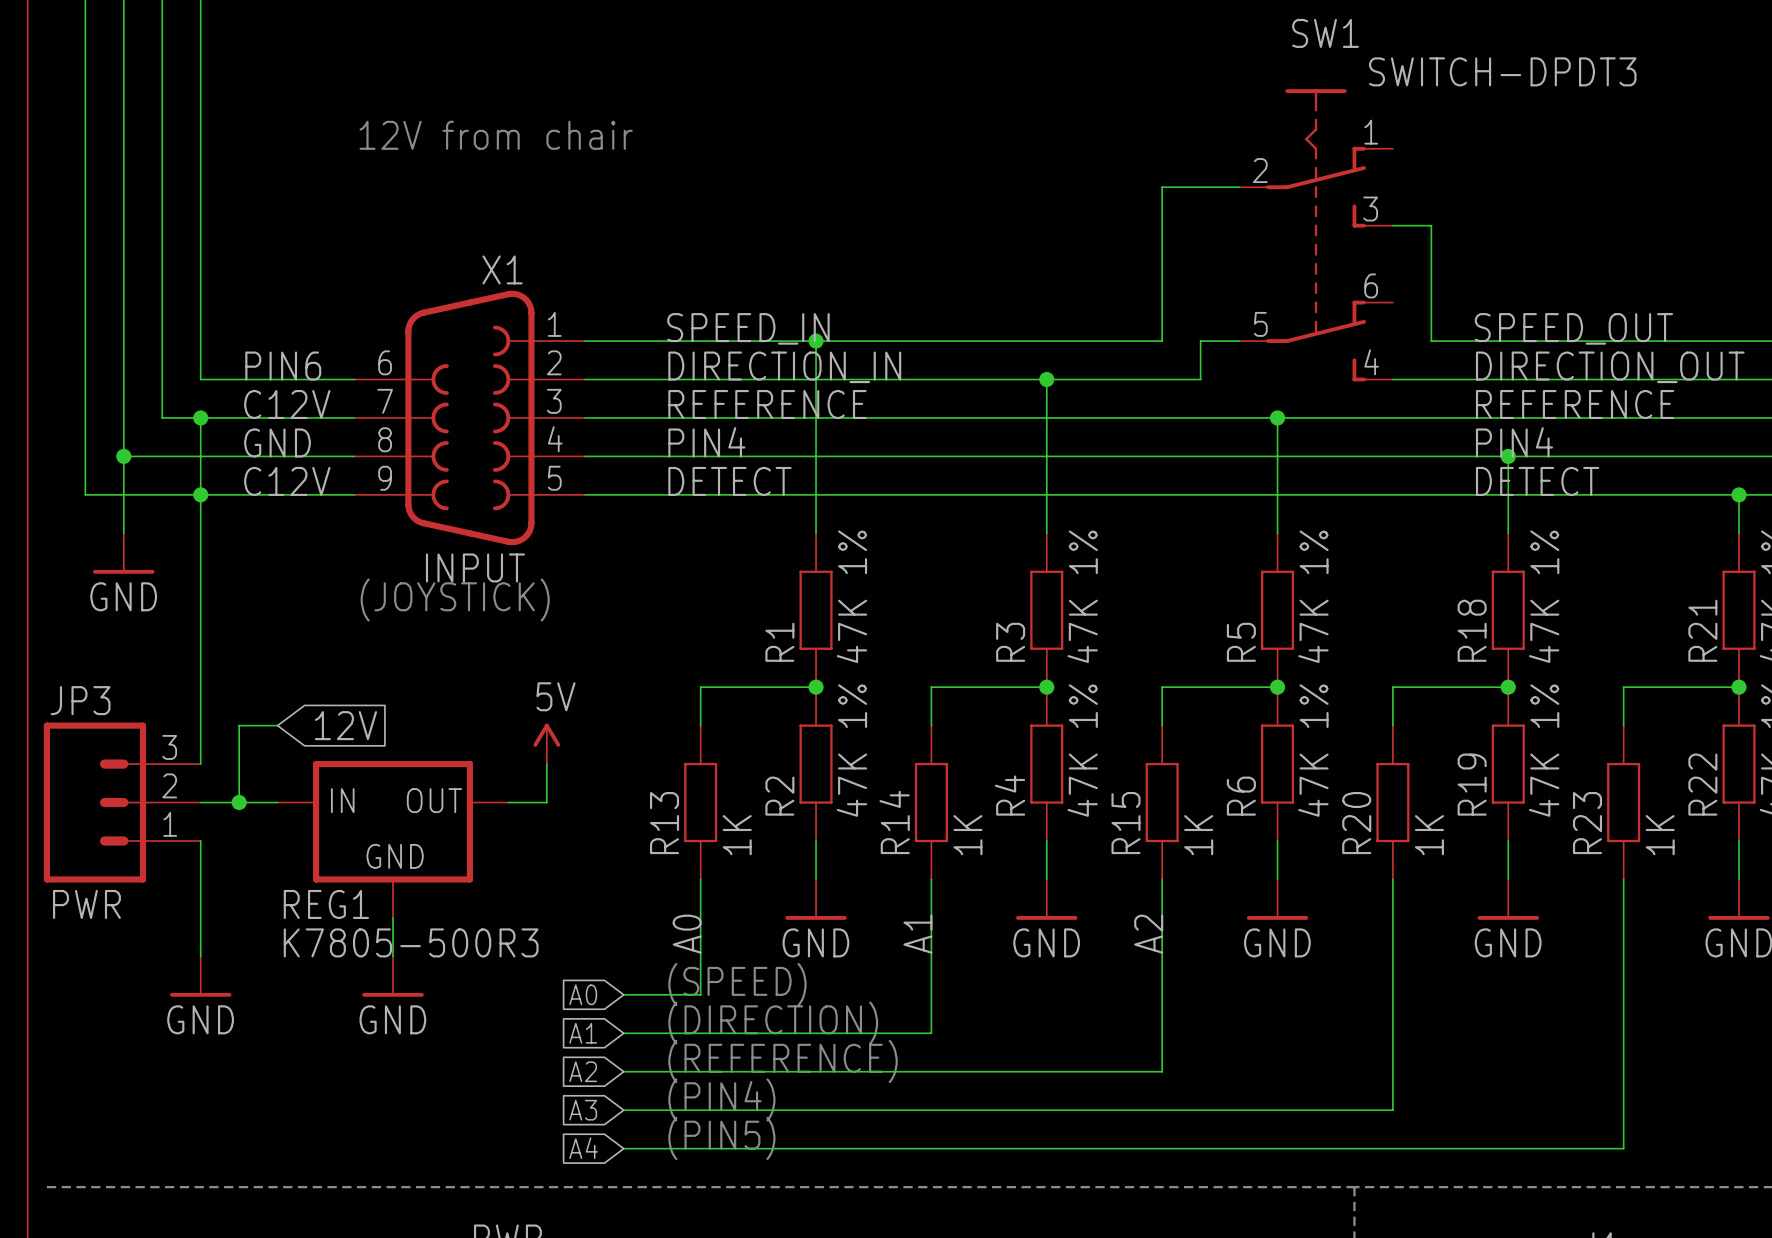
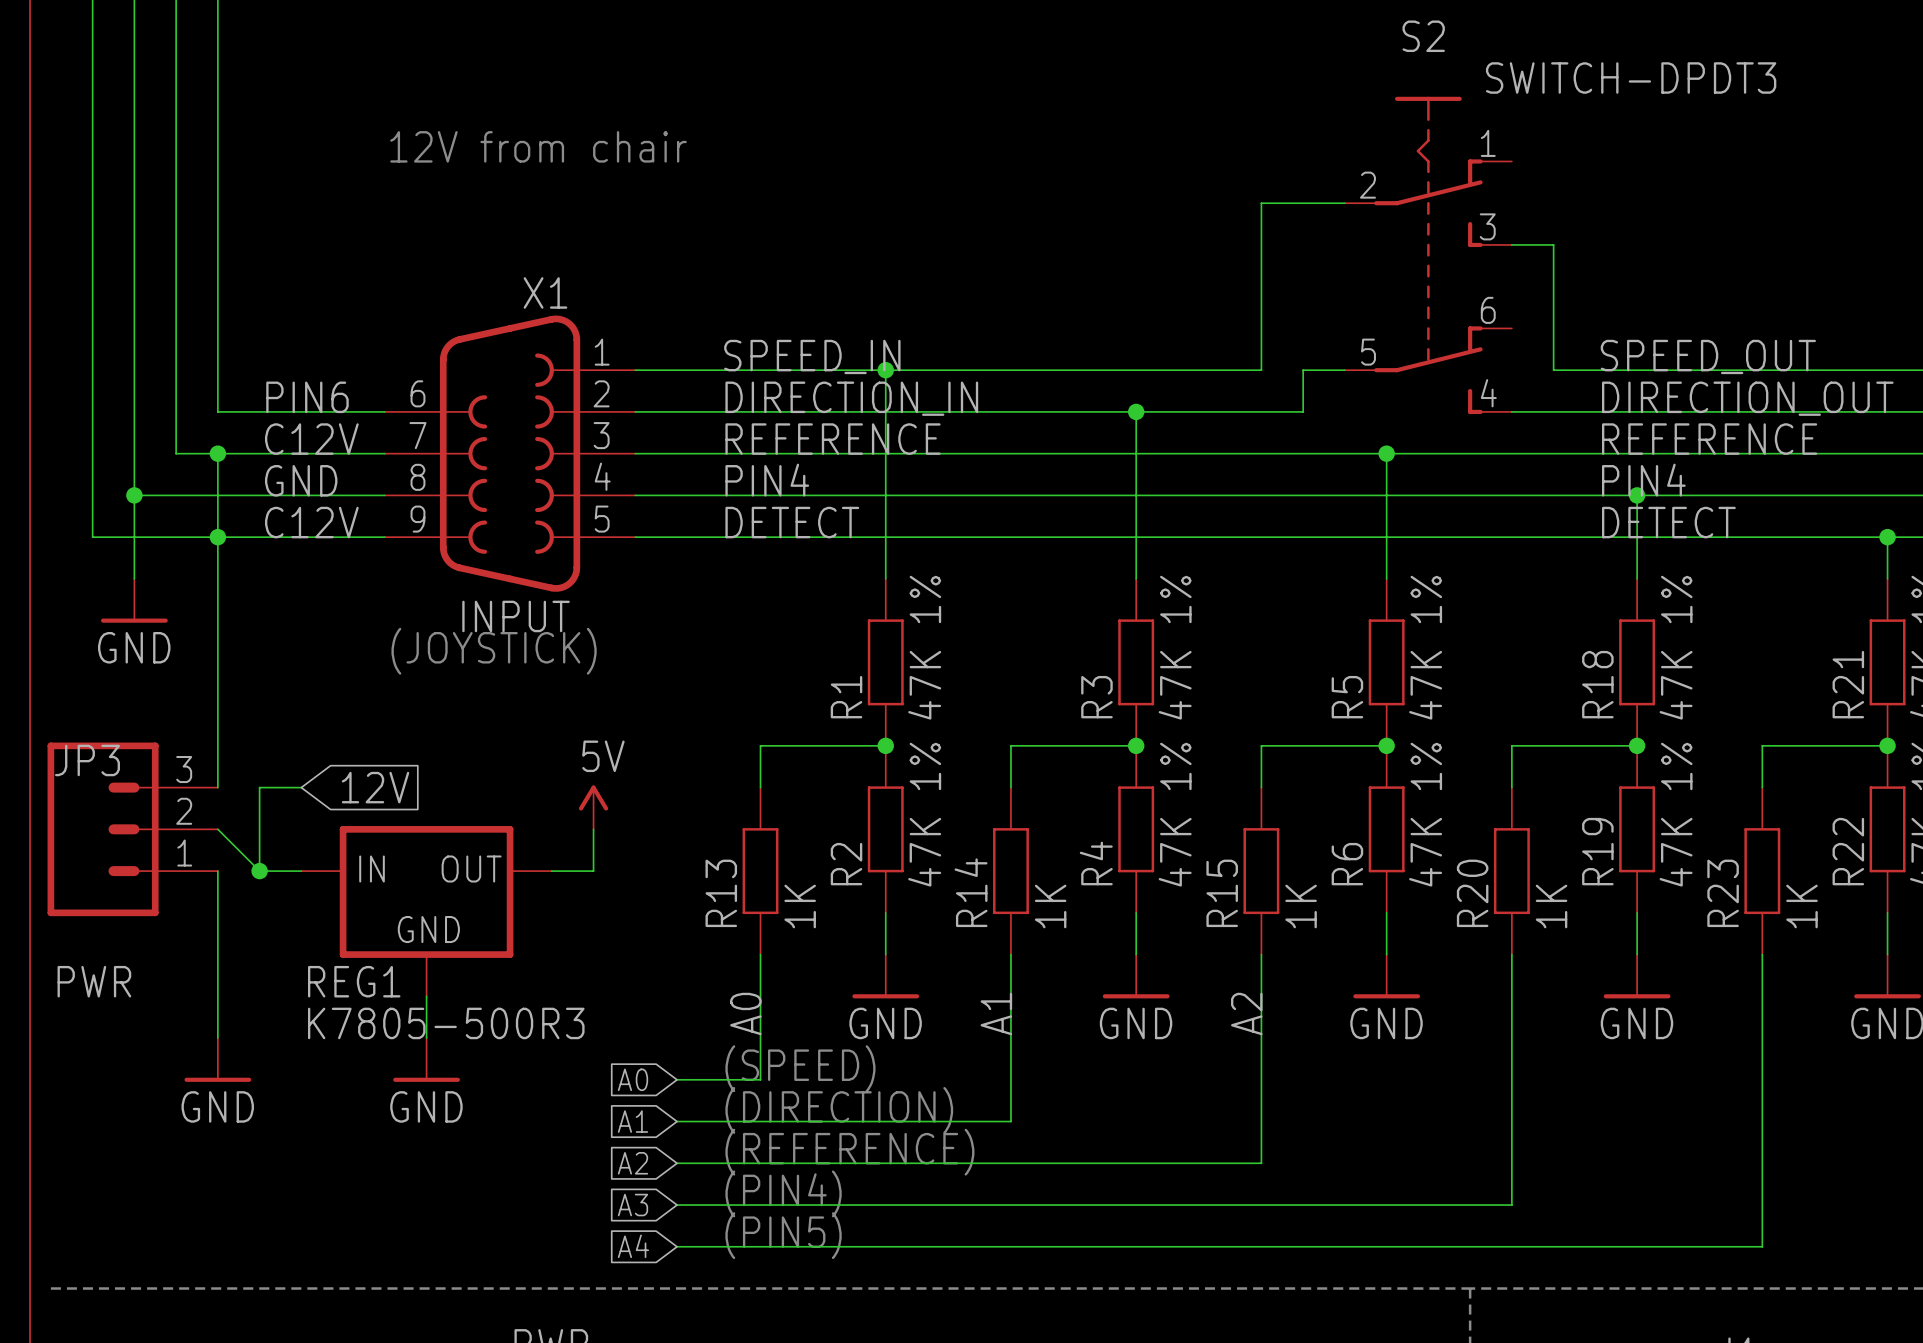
SW1 name: SW1 (1325, 33) -> S2 (1423, 36)
wire: (200, 725) (200, 764) -> (217, 871) (217, 912)
JP3 position: (122, 802) -> (132, 829)
wire: (200, 802) (239, 802) -> (217, 829) (259, 871)

